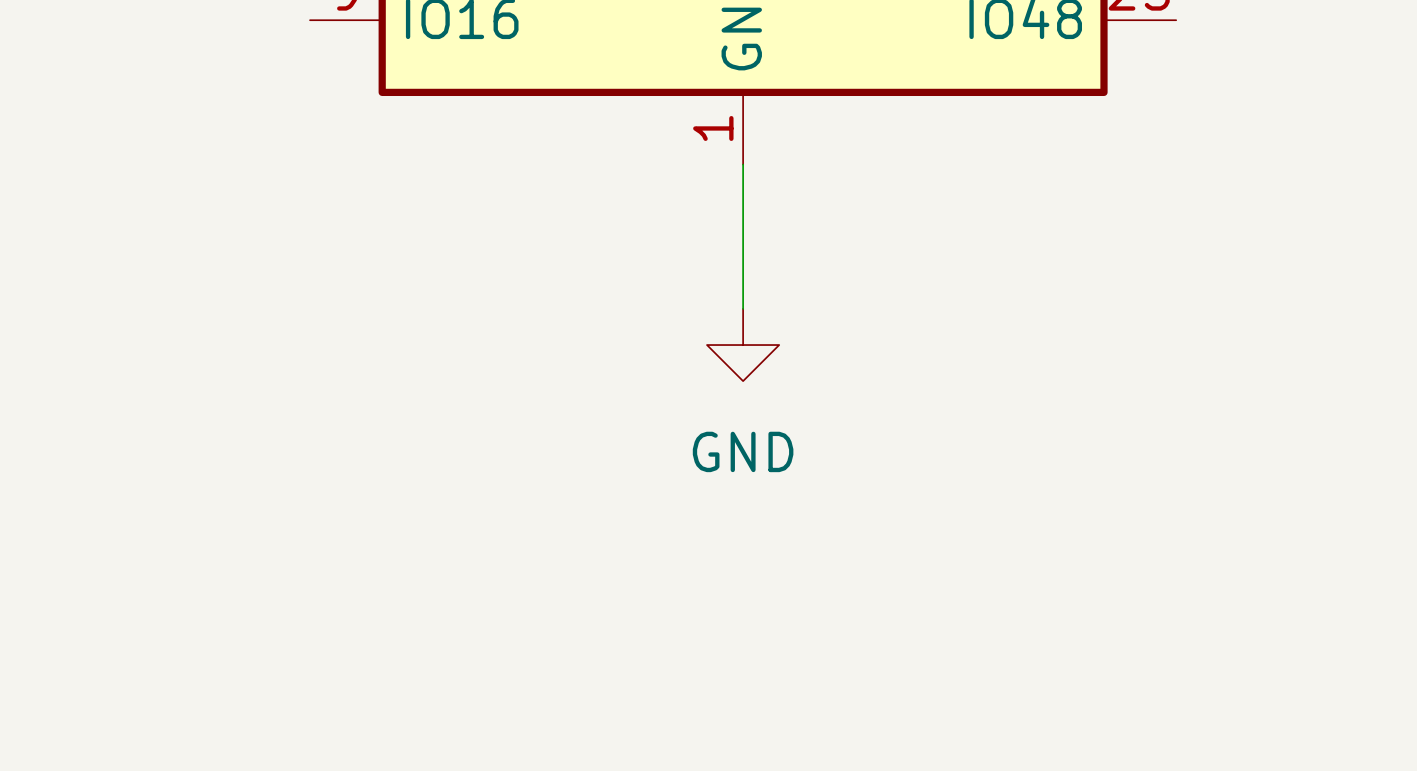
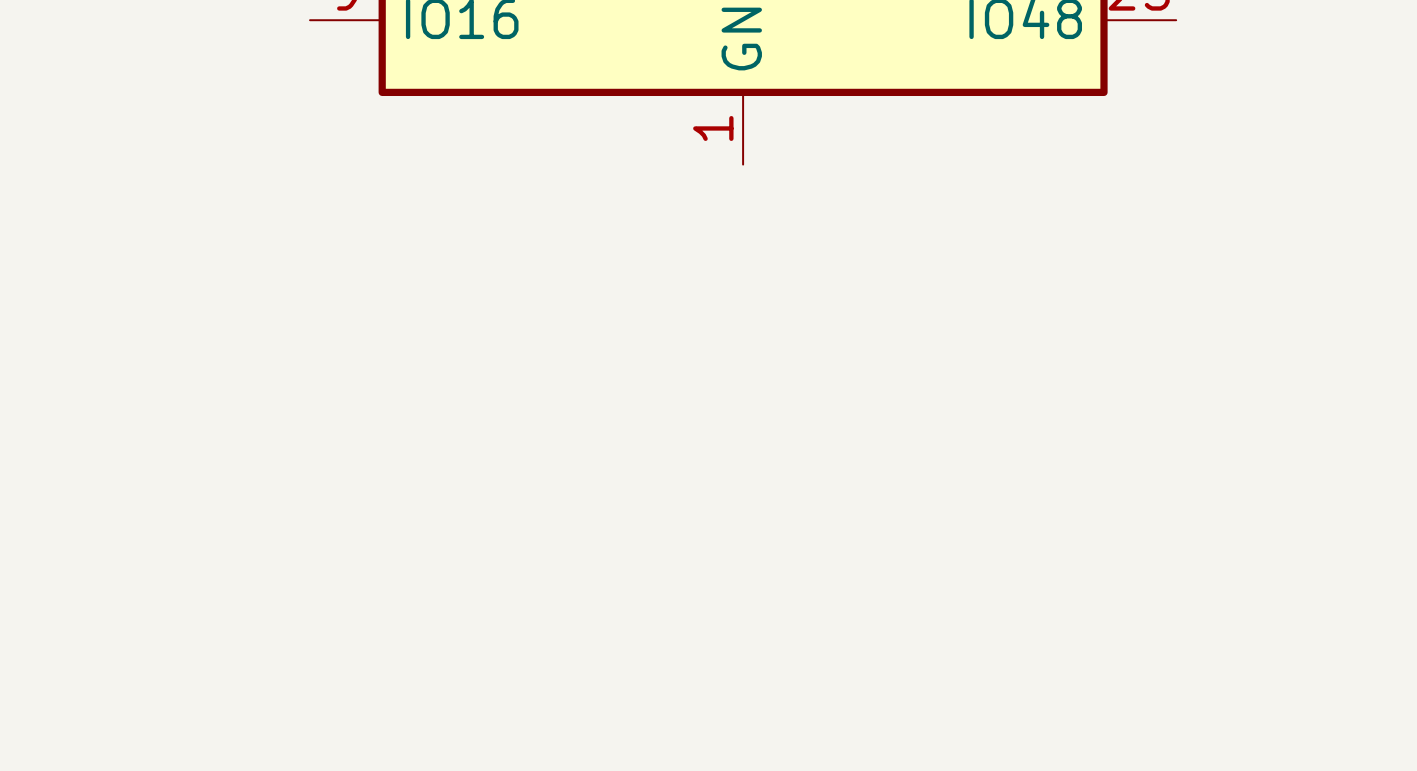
wire: (743, 164) (743, 308) -> none
power symbol: GND (743, 345) -> none

